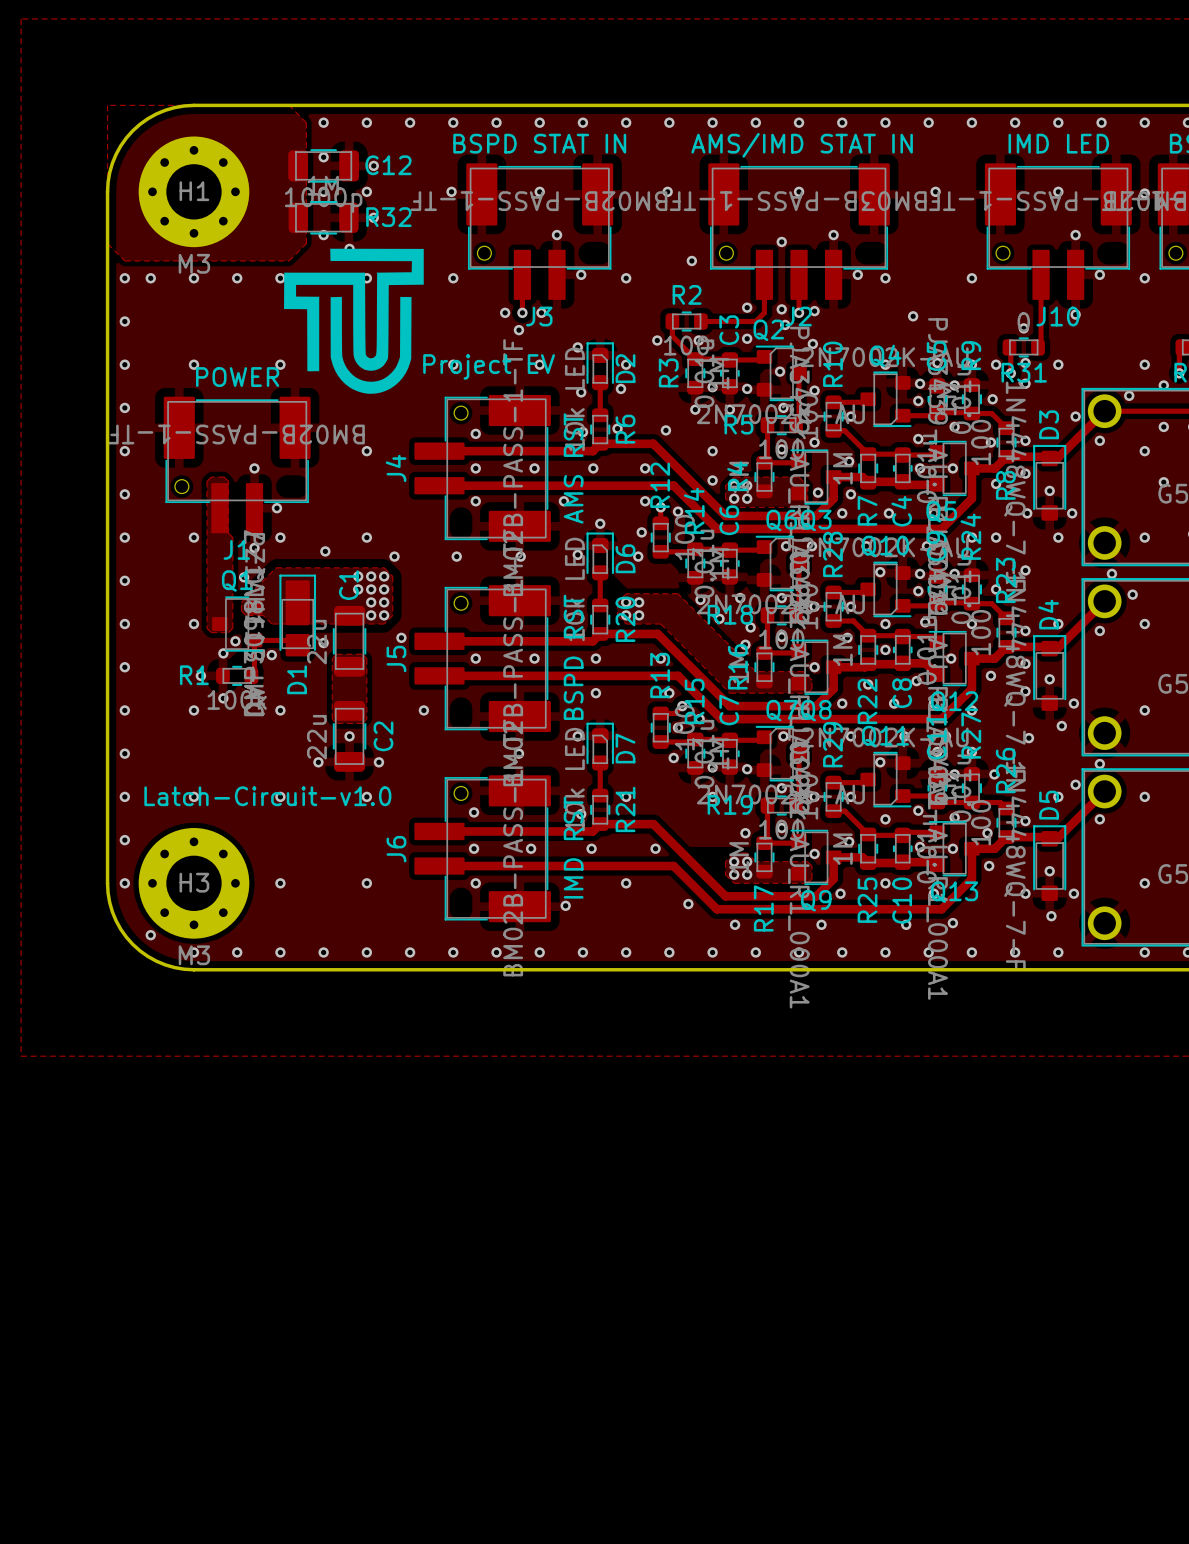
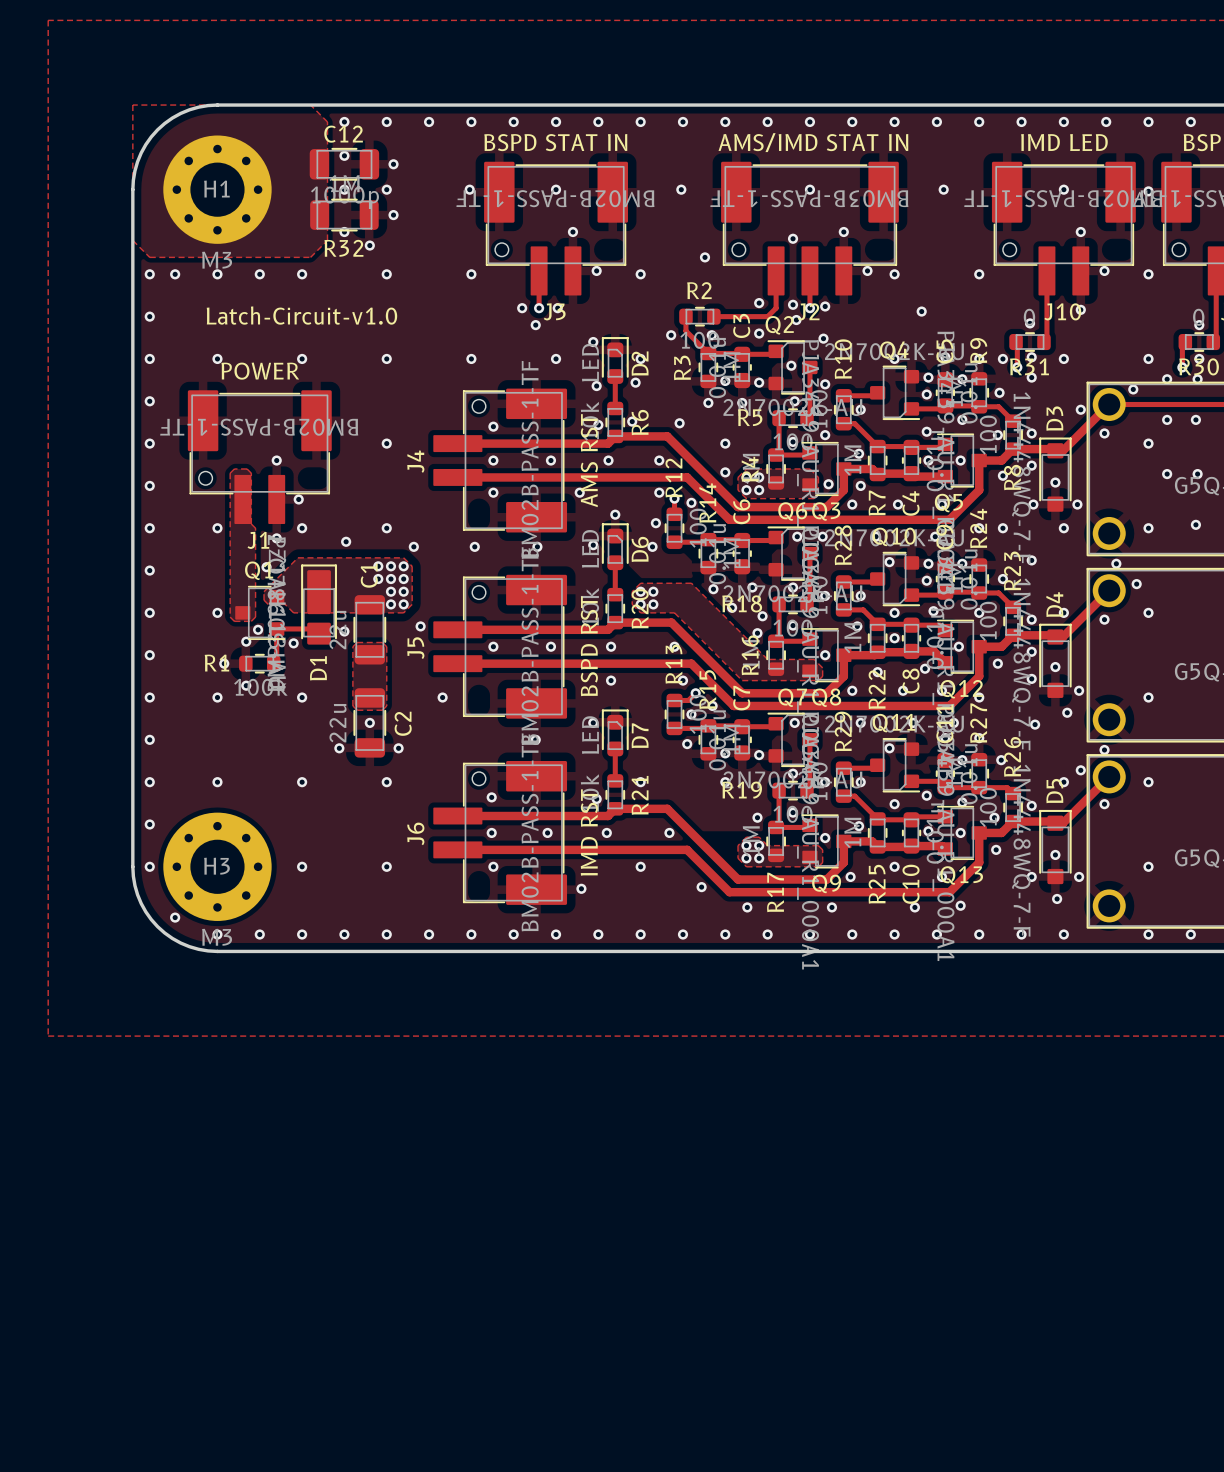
C12 name position: C12 (388, 165) -> C12 (343, 134)
R32 name position: R32 (388, 217) -> R32 (343, 248)
drawing: [284, 248, 424, 394] -> none
text: none -> Latch-Circuit-v1.0 (301, 315)
text: Project EV (489, 366) -> none
text: Latch-Circuit-v1.0 (267, 796) -> none

